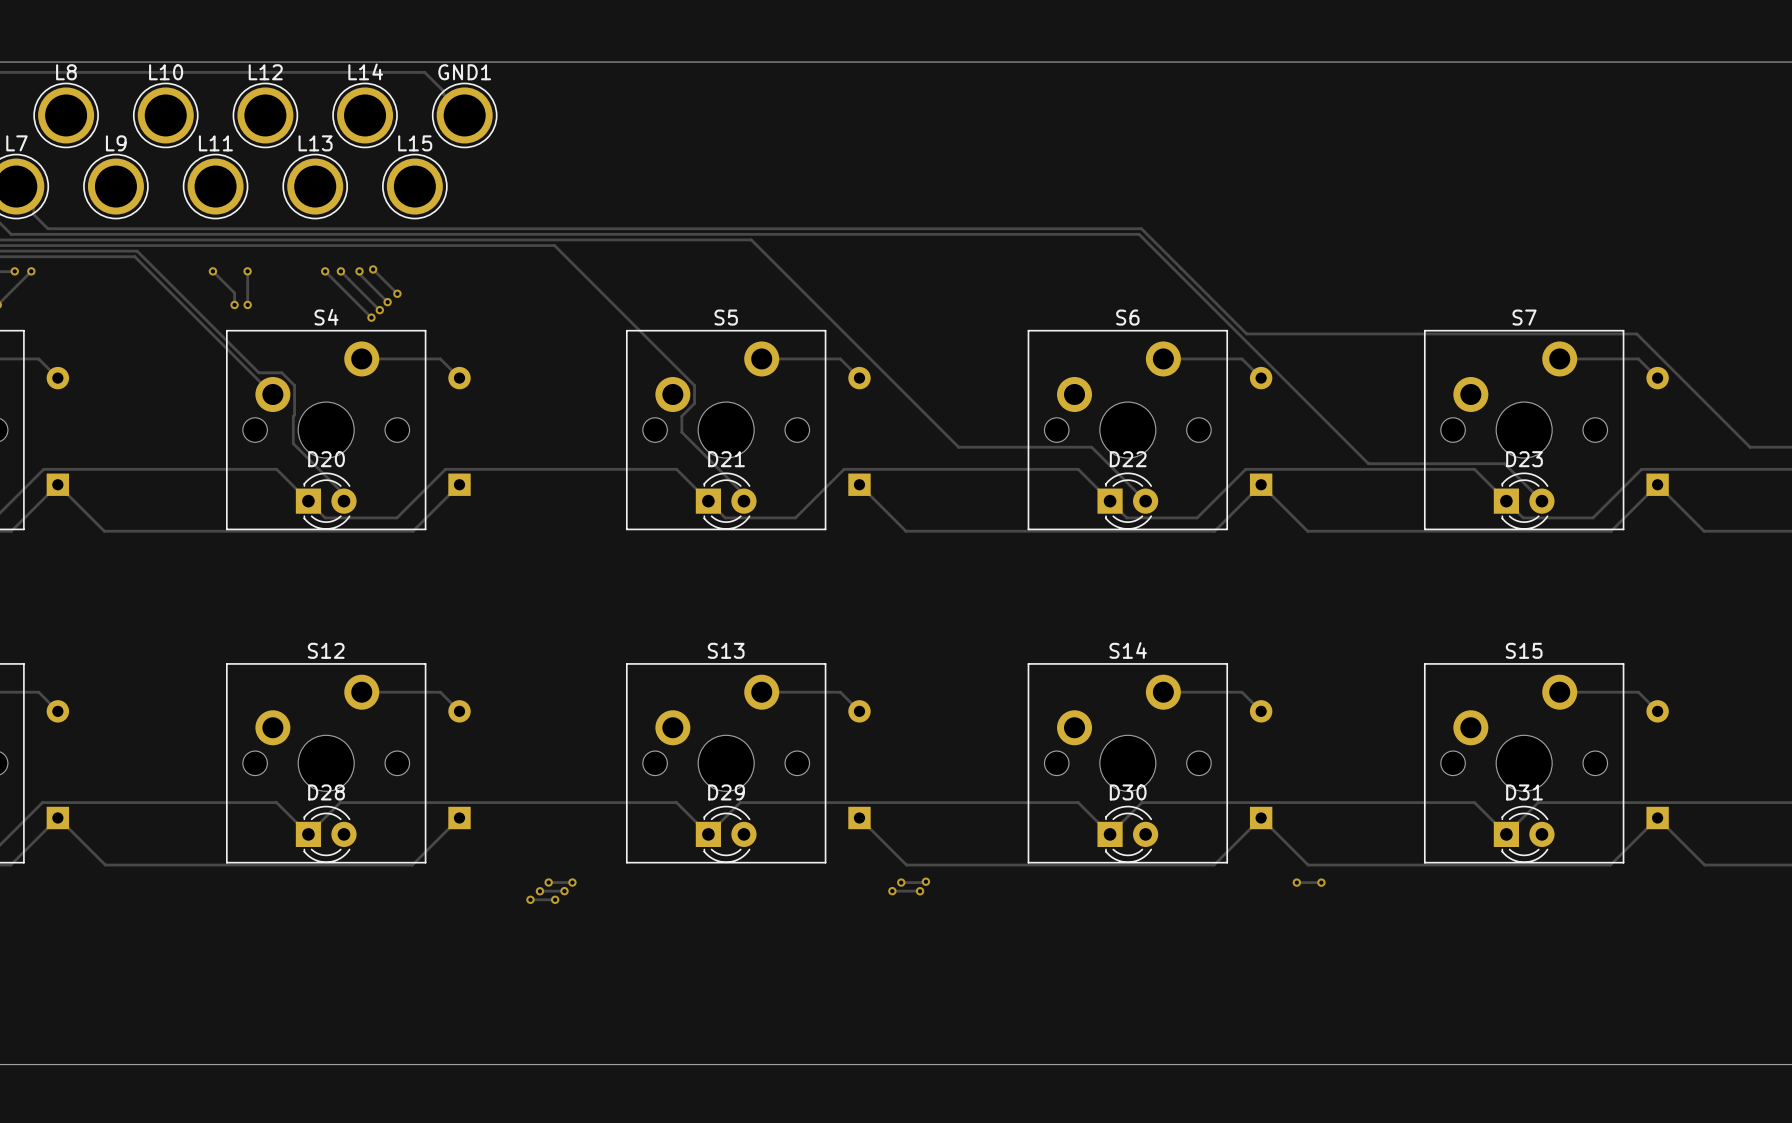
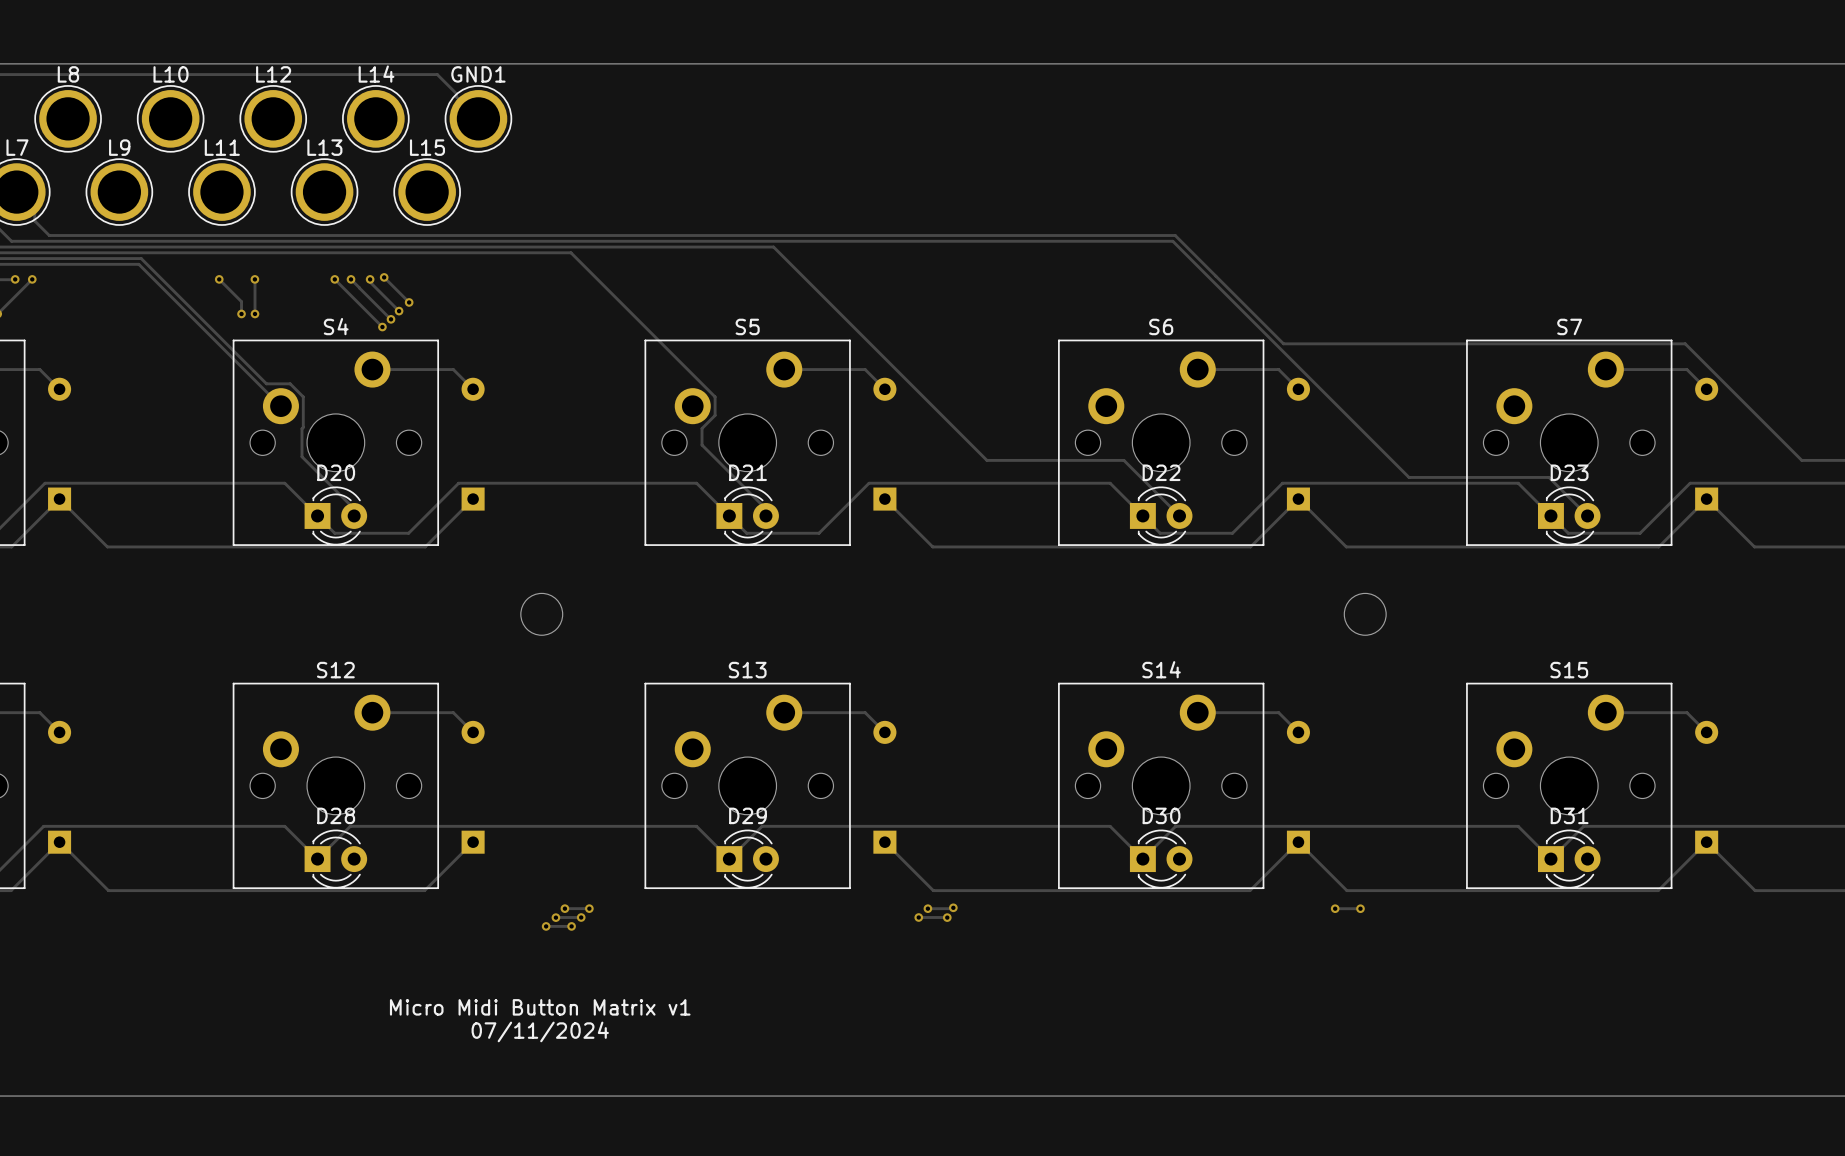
round board edge: none -> [520, 593, 564, 636]
round board edge: none -> [1343, 593, 1387, 636]
text: none -> Micro Midi Button Matrix v1 (540, 1007)
text: none -> 07/11/2024 (540, 1031)

